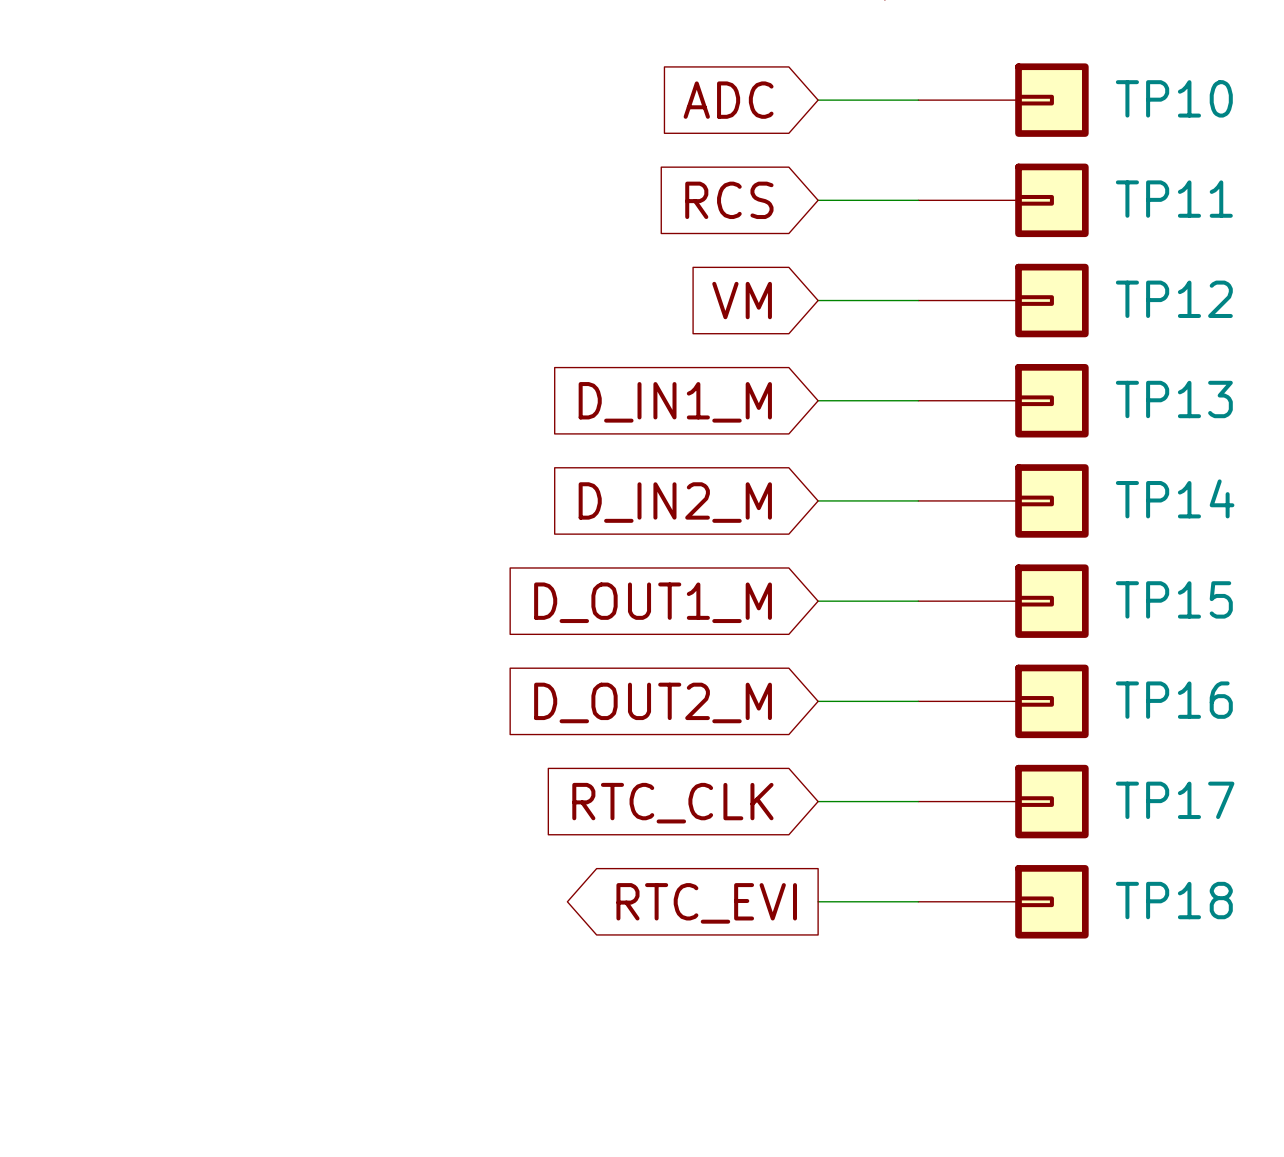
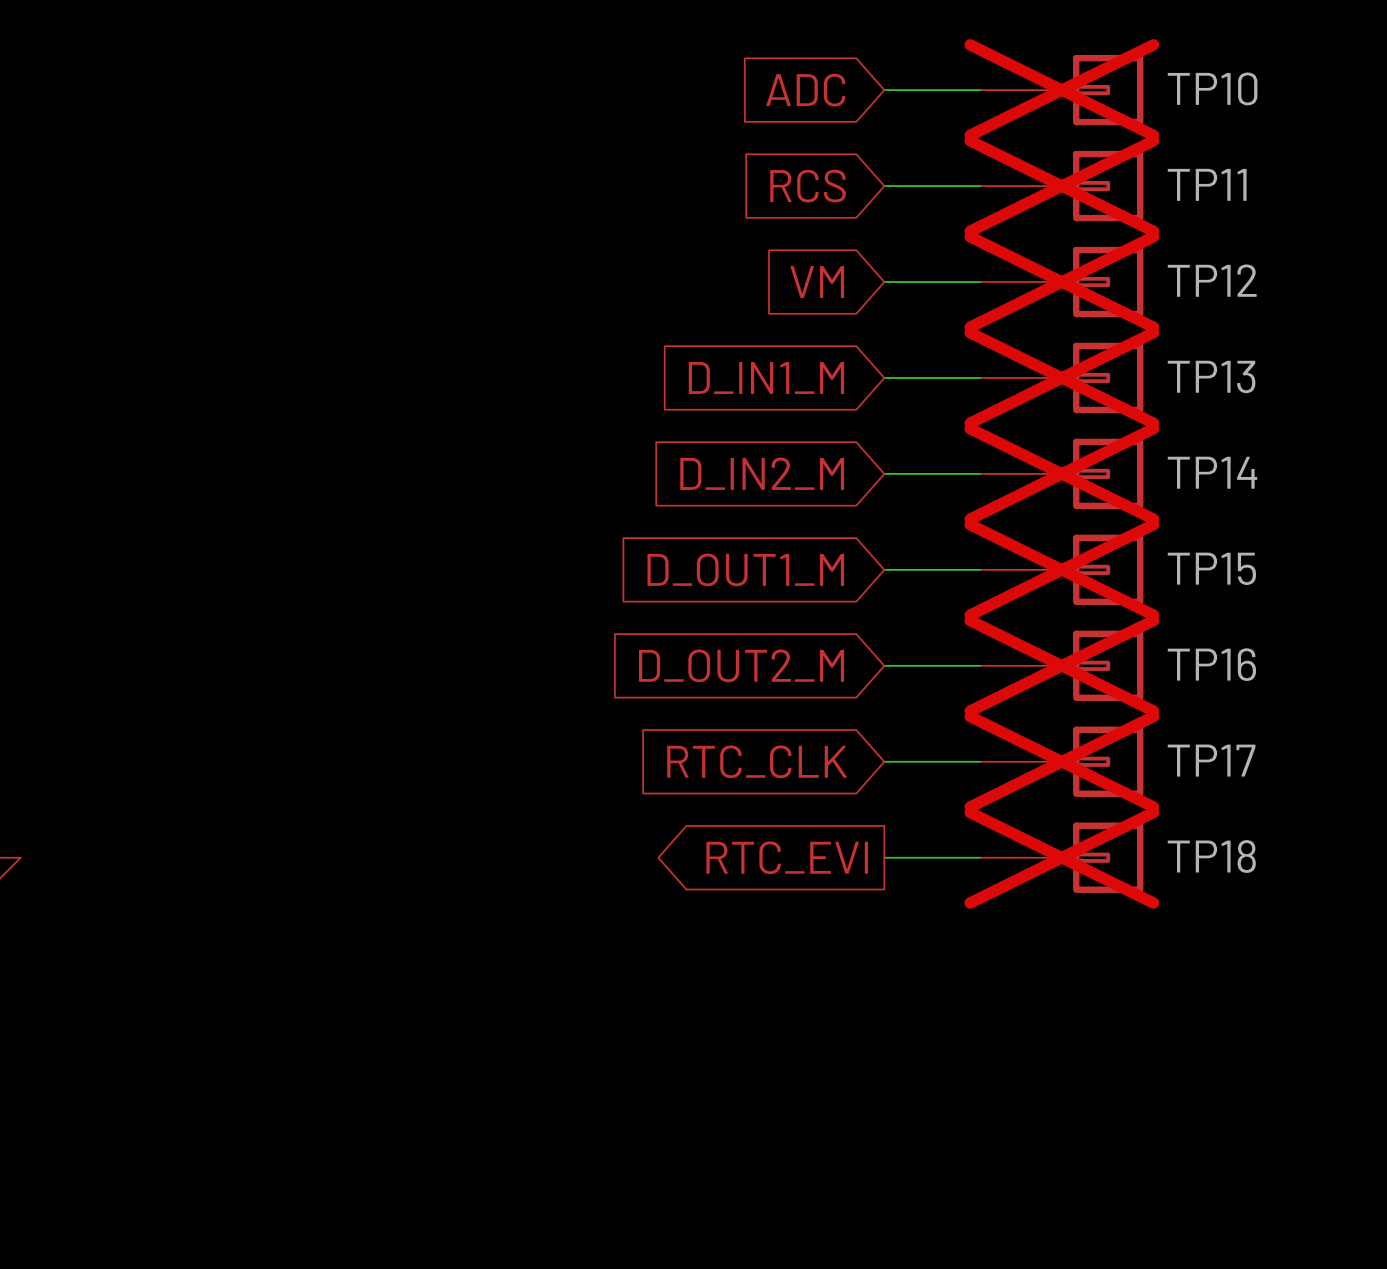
TP10 do-not-place cross: none -> (1061, 90)
TP11 do-not-place cross: none -> (1061, 186)
TP12 do-not-place cross: none -> (1061, 282)
TP13 do-not-place cross: none -> (1061, 377)
TP14 do-not-place cross: none -> (1061, 473)
TP15 do-not-place cross: none -> (1061, 569)
TP16 do-not-place cross: none -> (1061, 665)
TP17 do-not-place cross: none -> (1061, 761)
TP18 do-not-place cross: none -> (1061, 857)

